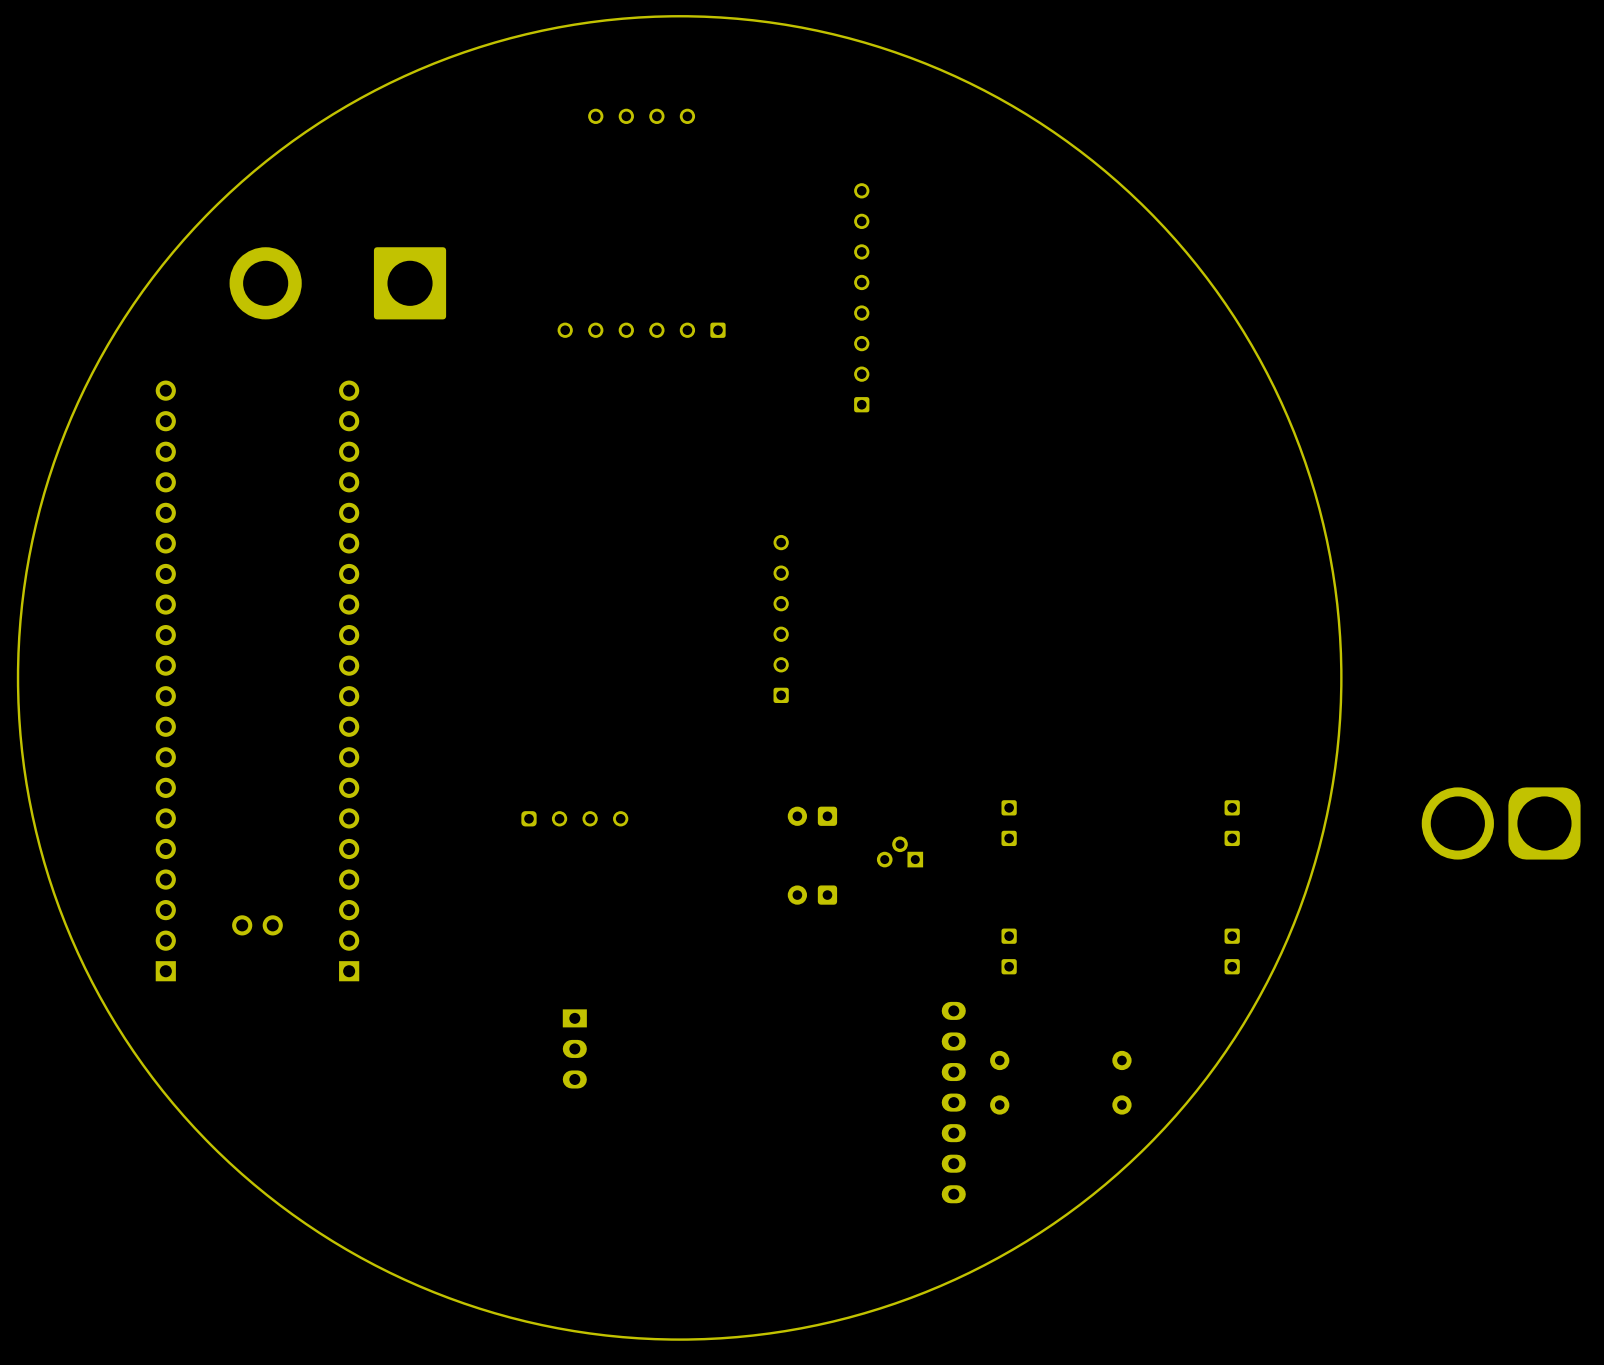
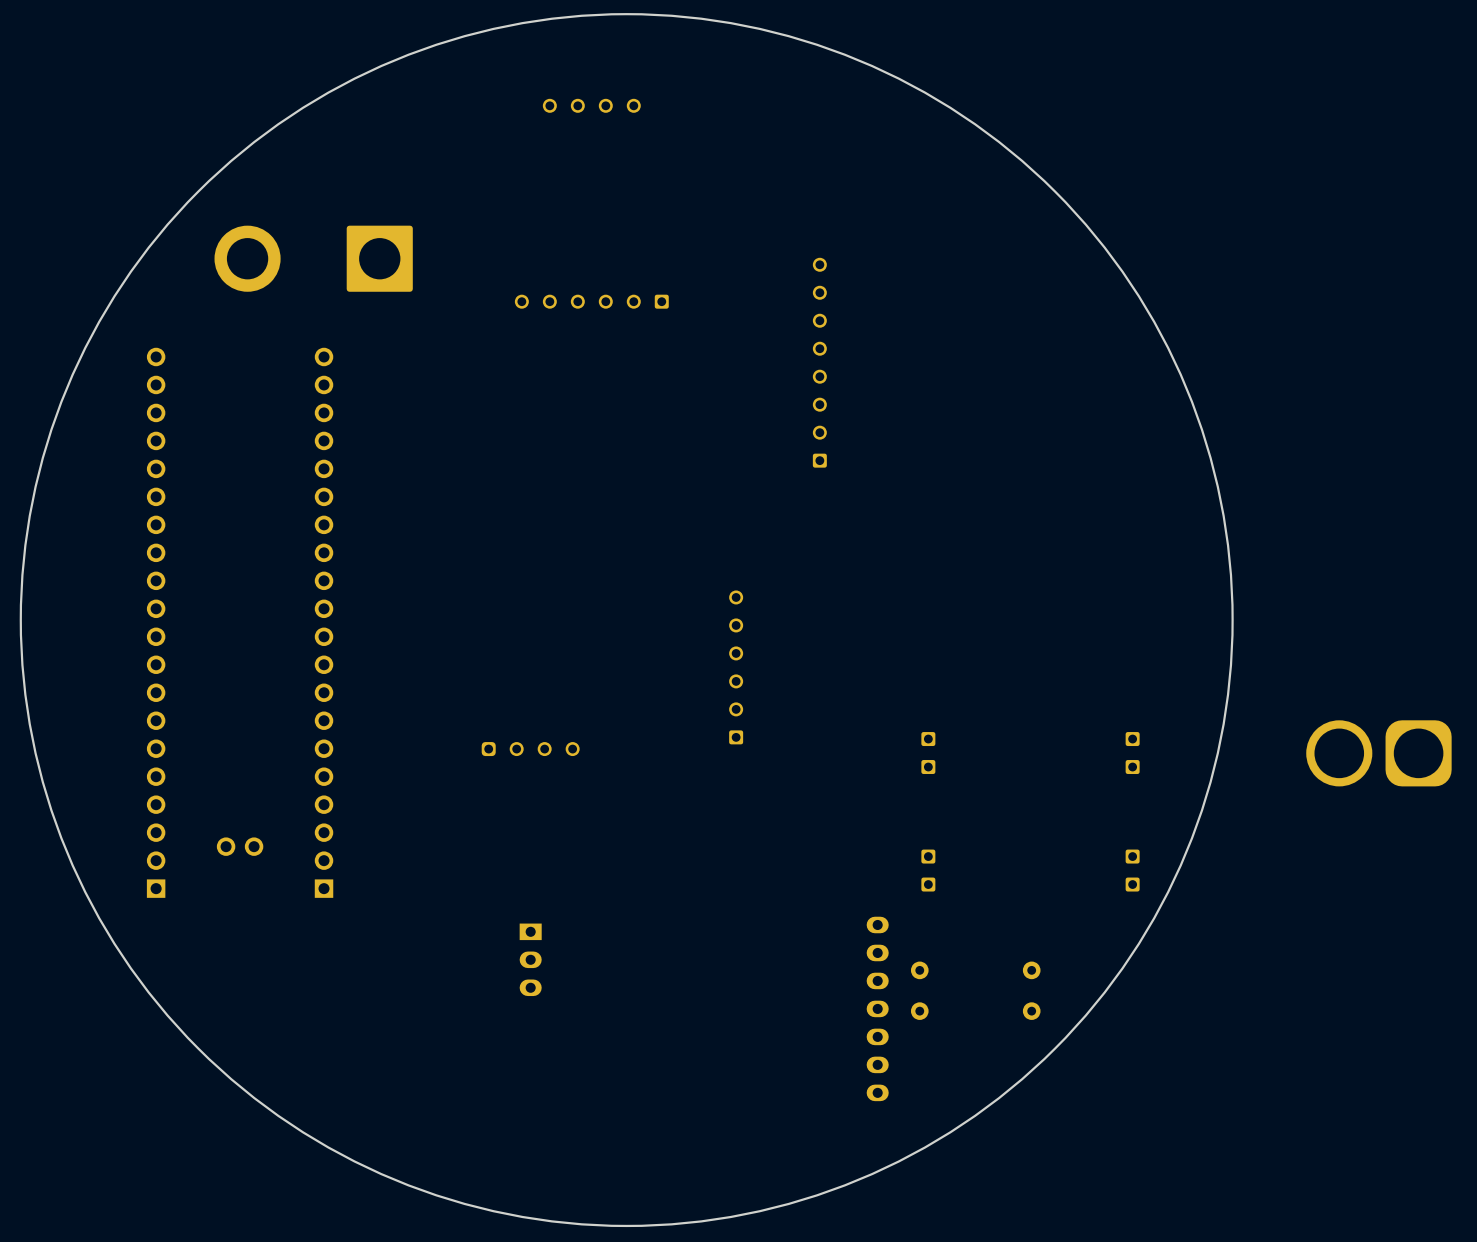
part position: (861, 297) -> (819, 362)
part position: (781, 618) -> (736, 667)
part: (812, 816) -> none
part: (900, 851) -> none
part: (812, 895) -> none

